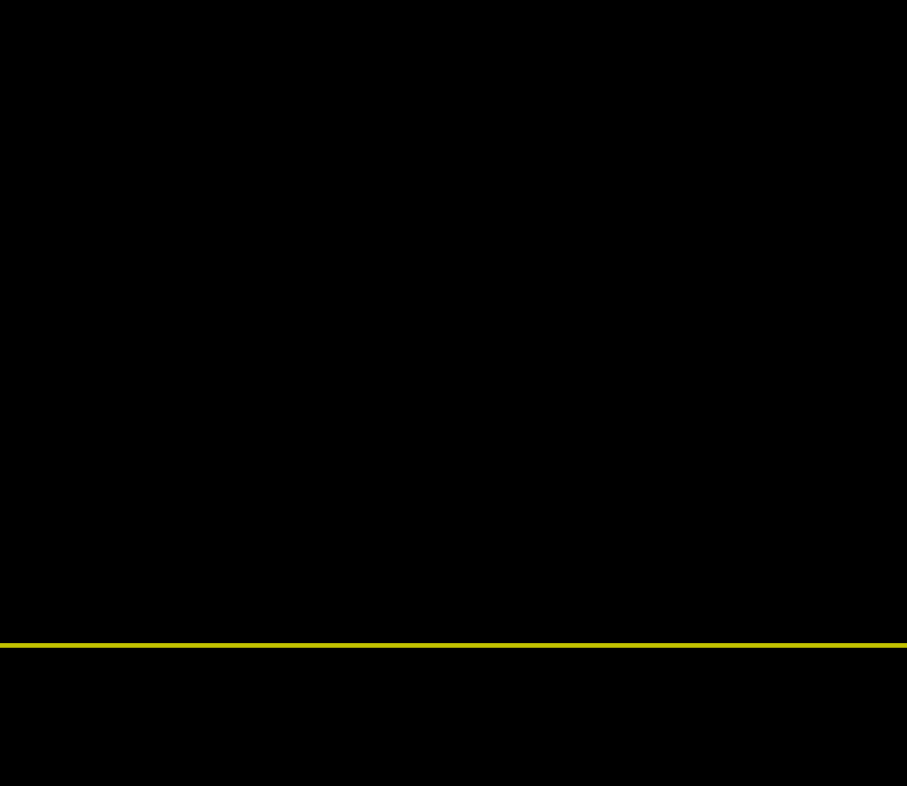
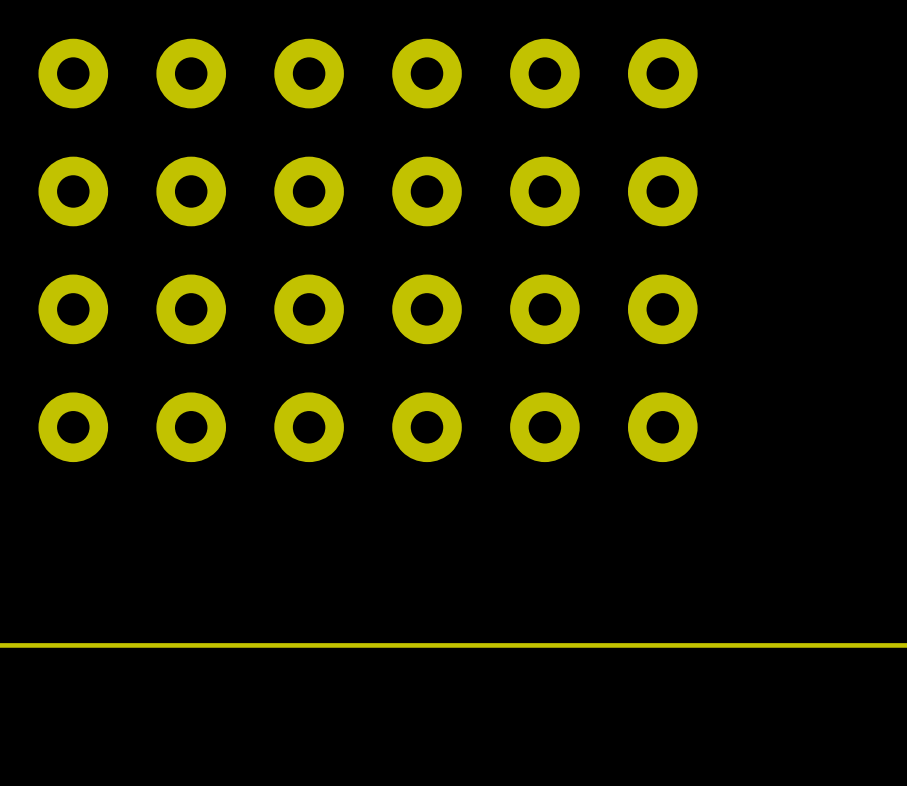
part: none -> (73, 73)
part: none -> (191, 73)
part: none -> (309, 73)
part: none -> (427, 73)
part: none -> (544, 73)
part: none -> (662, 73)
part: none -> (73, 191)
part: none -> (191, 191)
part: none -> (309, 191)
part: none -> (427, 191)
part: none -> (544, 191)
part: none -> (662, 191)
part: none -> (73, 309)
part: none -> (191, 309)
part: none -> (309, 309)
part: none -> (427, 309)
part: none -> (544, 309)
part: none -> (662, 309)
part: none -> (73, 427)
part: none -> (191, 427)
part: none -> (309, 427)
part: none -> (427, 427)
part: none -> (544, 427)
part: none -> (662, 427)

